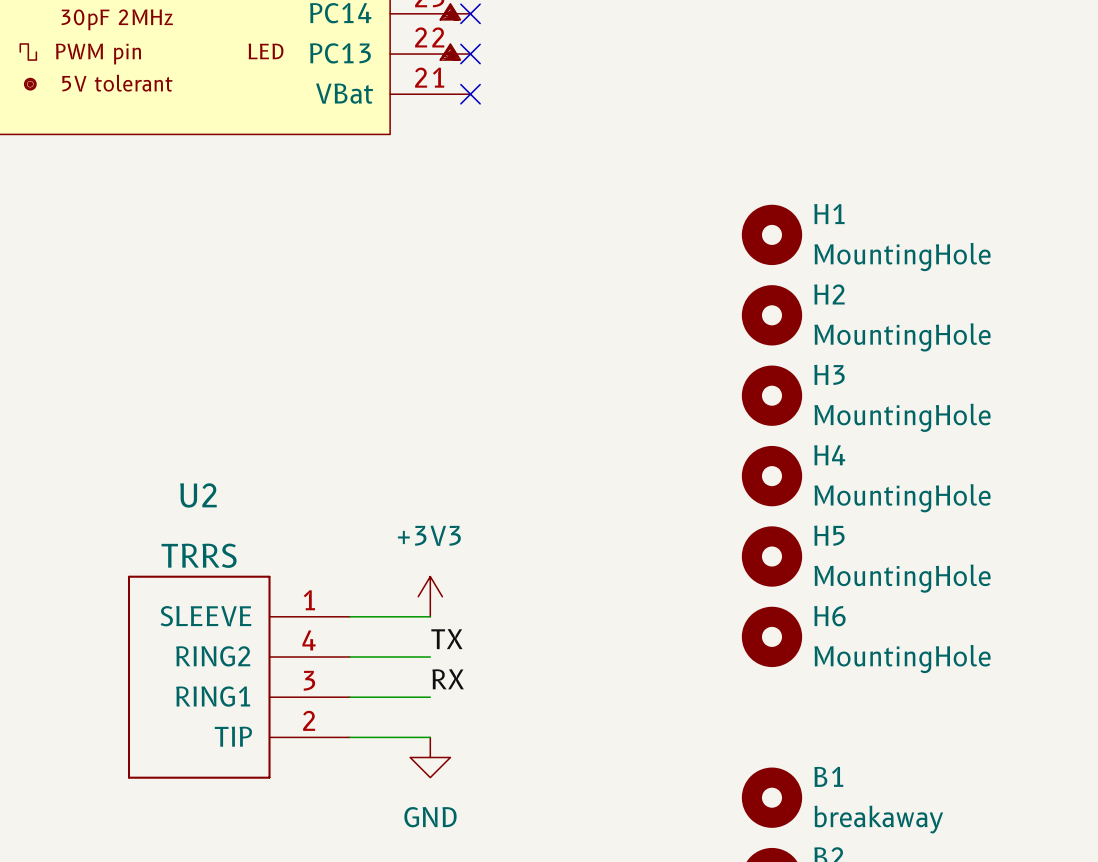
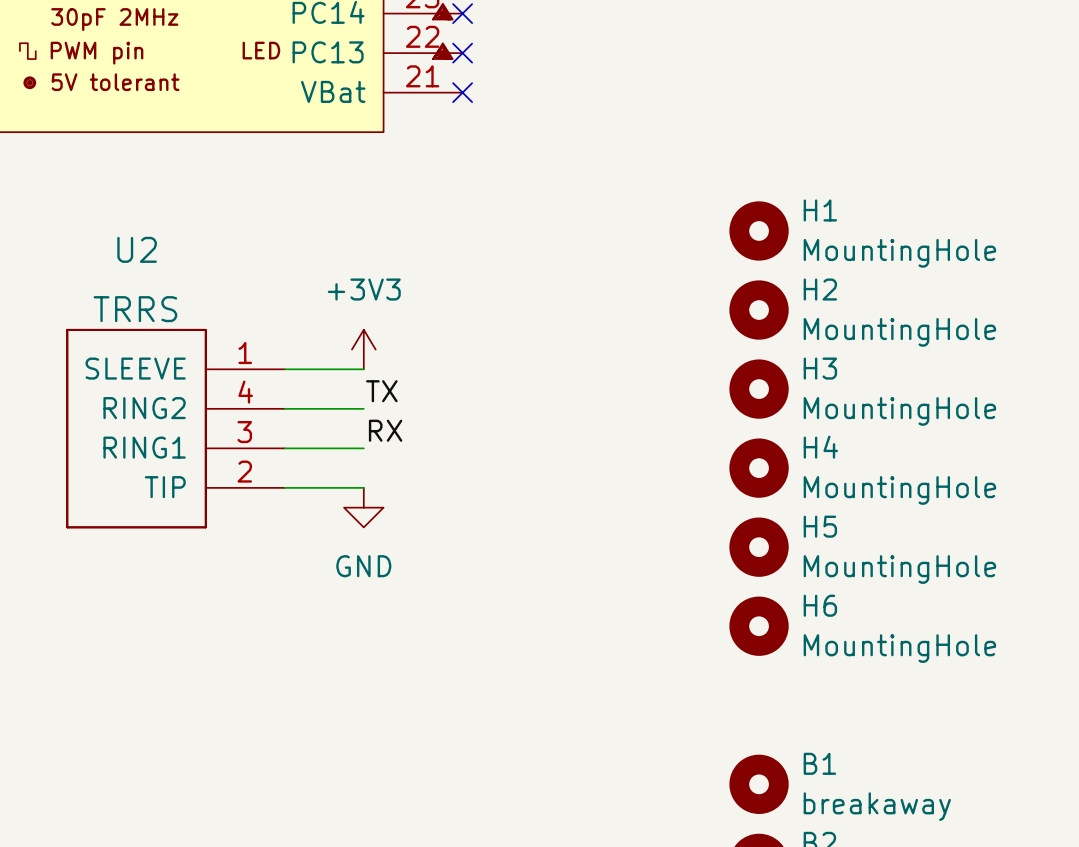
power symbol position: +3V3 (430, 596) -> +3V3 (363, 349)
wire: (349, 616) (430, 616) -> (284, 487) (363, 487)
label position: TX (446, 639) -> TX (381, 391)
wire: (349, 657) (430, 657) -> (284, 448) (363, 448)
U2 position: (239, 677) -> (176, 428)
label position: RX (448, 679) -> RX (385, 430)
wire: (349, 697) (430, 697) -> (284, 408) (363, 408)
wire: (349, 737) (430, 737) -> (284, 369) (363, 369)
power symbol position: GND (430, 757) -> GND (363, 507)

